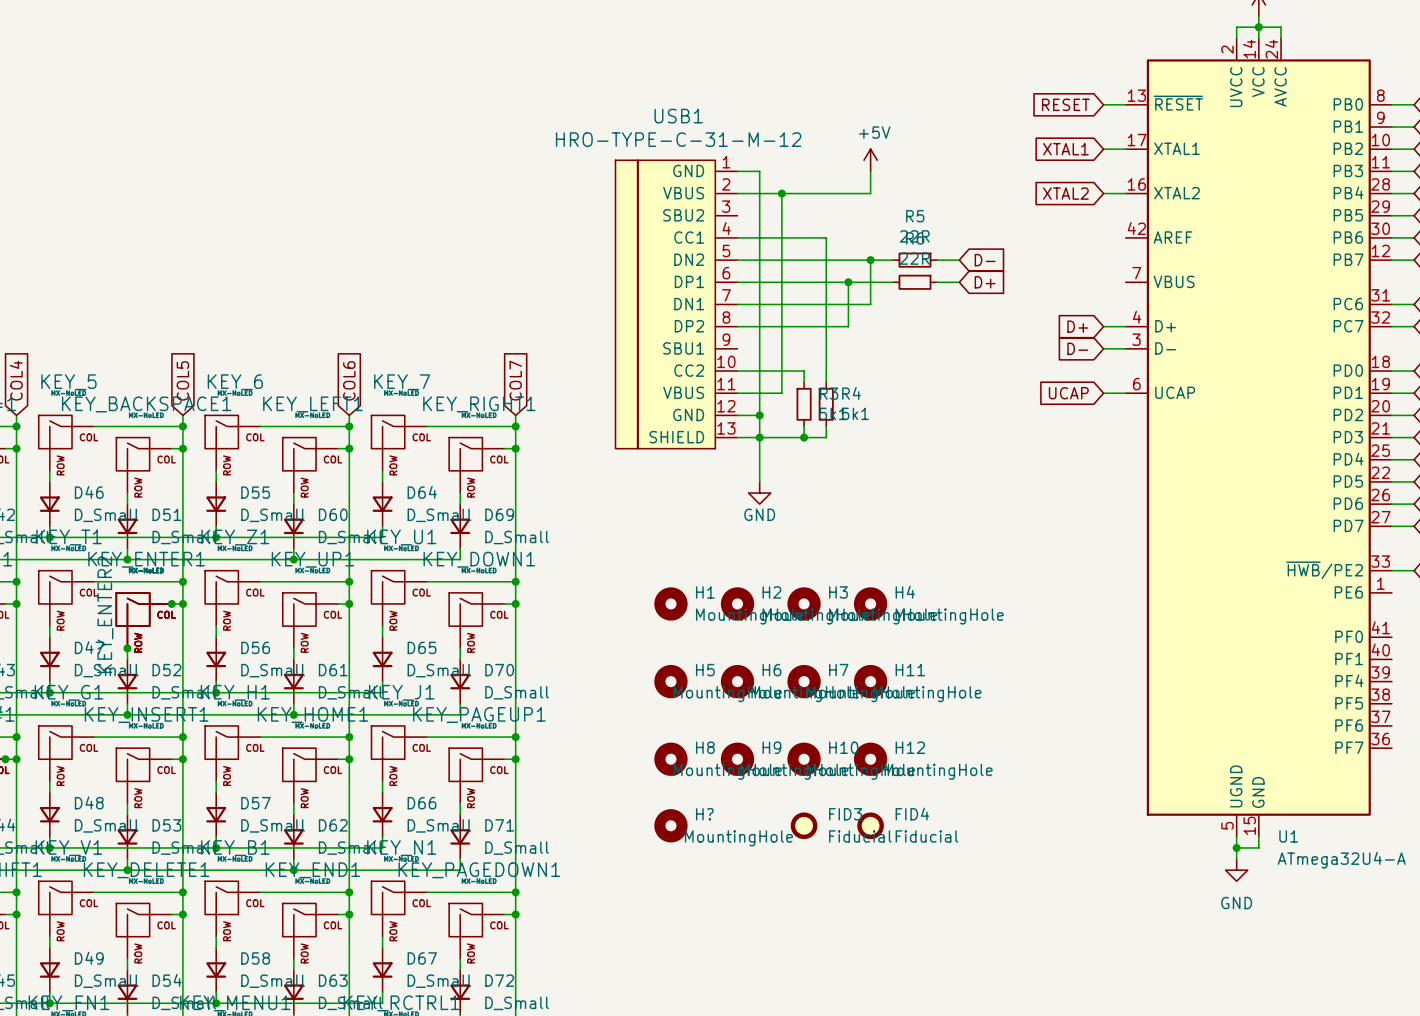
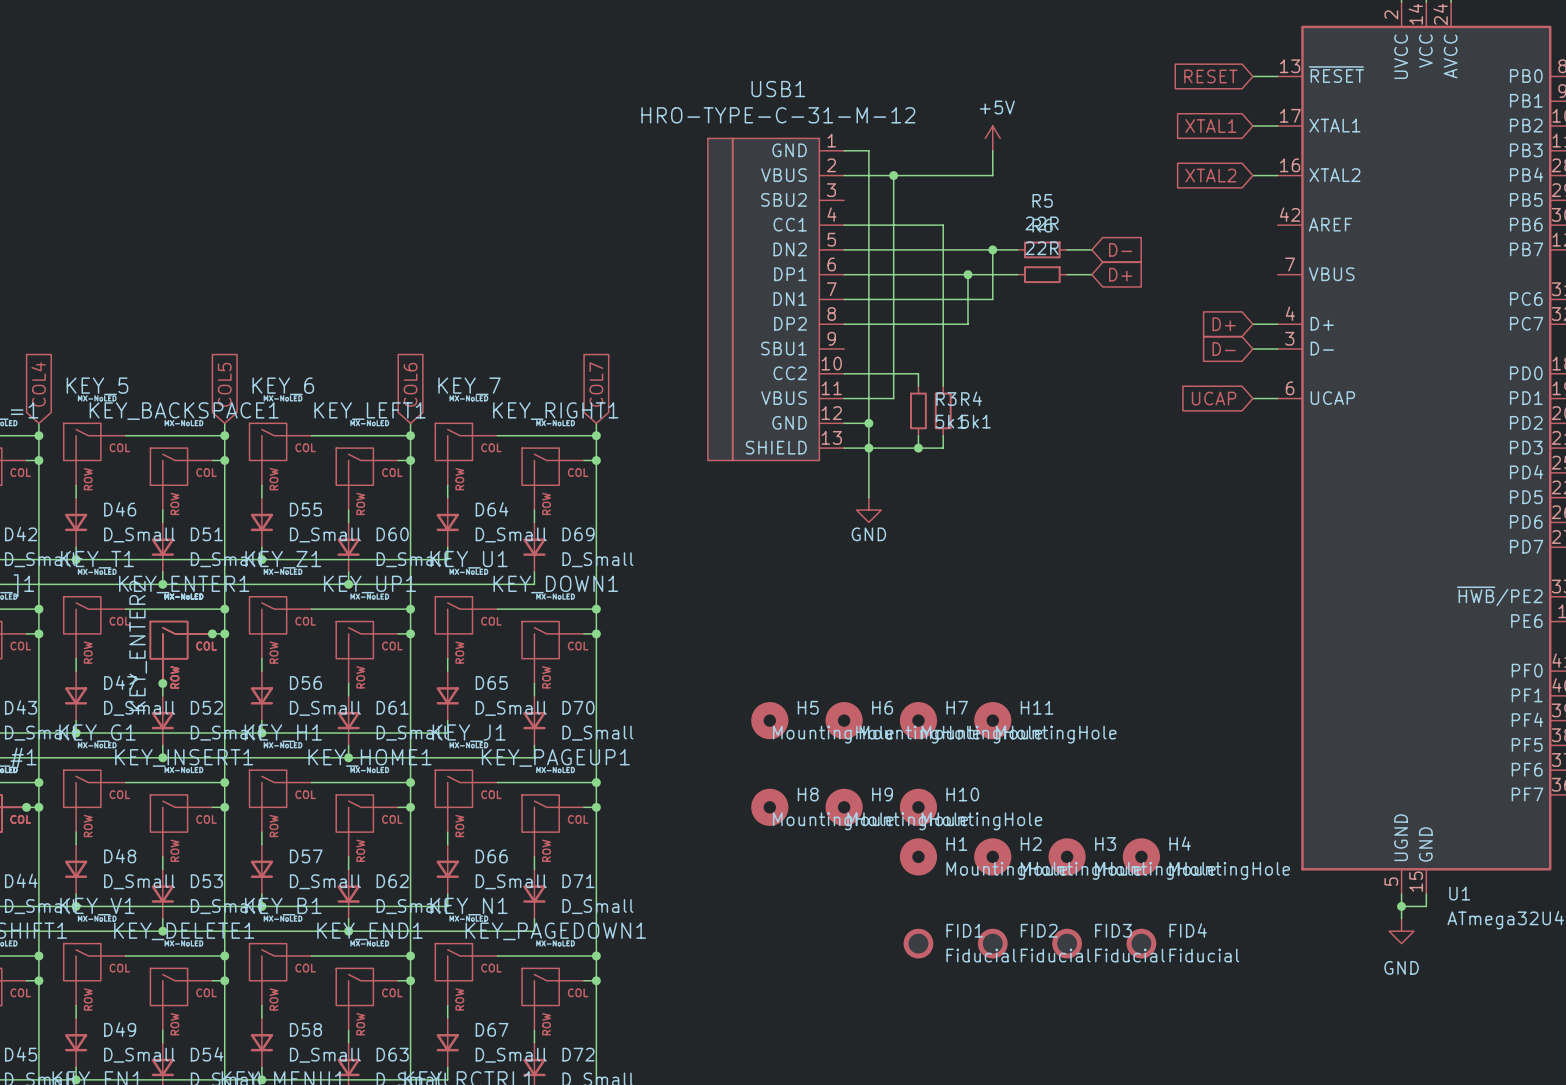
H1 position: (670, 603) -> (918, 856)
H2 position: (737, 603) -> (992, 856)
H3 position: (804, 603) -> (1067, 856)
H4 position: (870, 603) -> (1141, 856)
H12: MountingHole (870, 759) -> none
H?: MountingHole (670, 825) -> none
FID3 position: (804, 825) -> (1067, 943)
FID4 position: (870, 825) -> (1141, 943)
FID1: none -> Fiducial (918, 943)
FID2: none -> Fiducial (992, 943)

